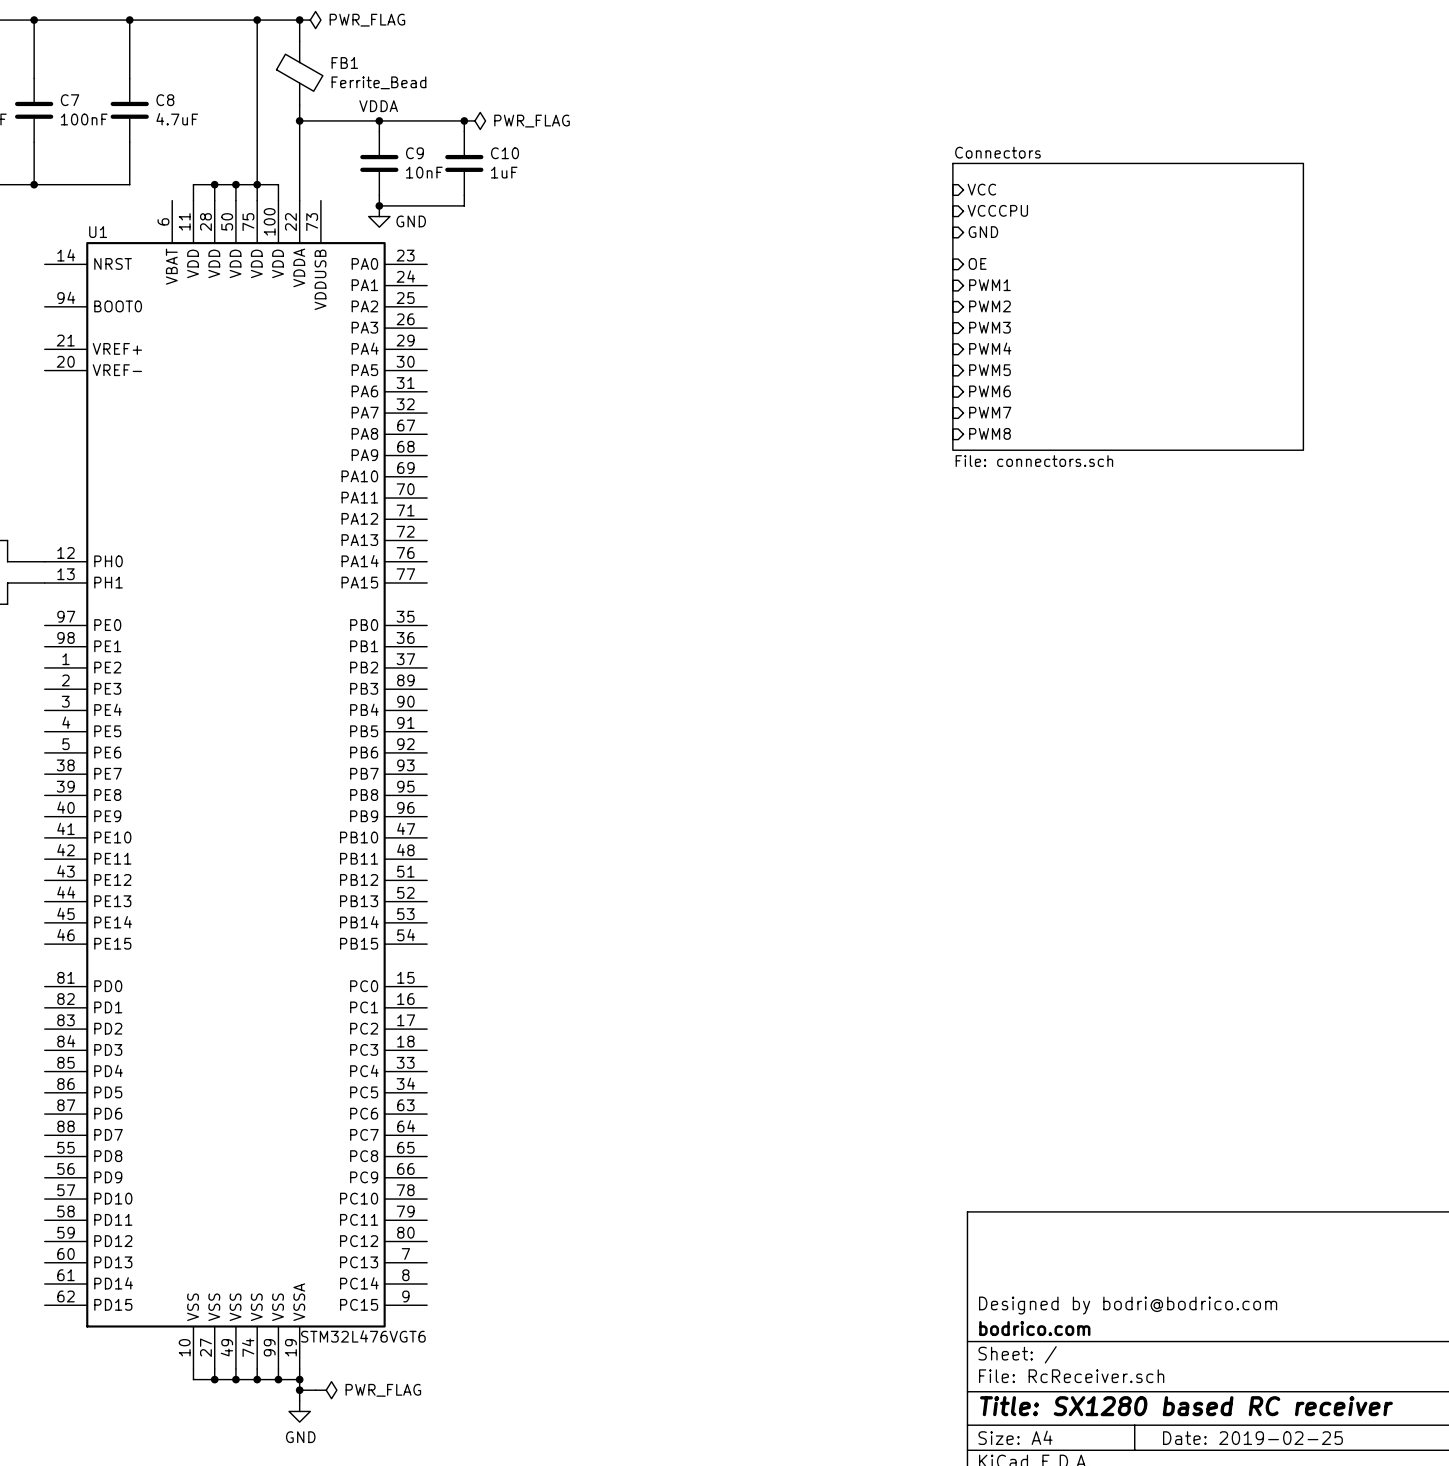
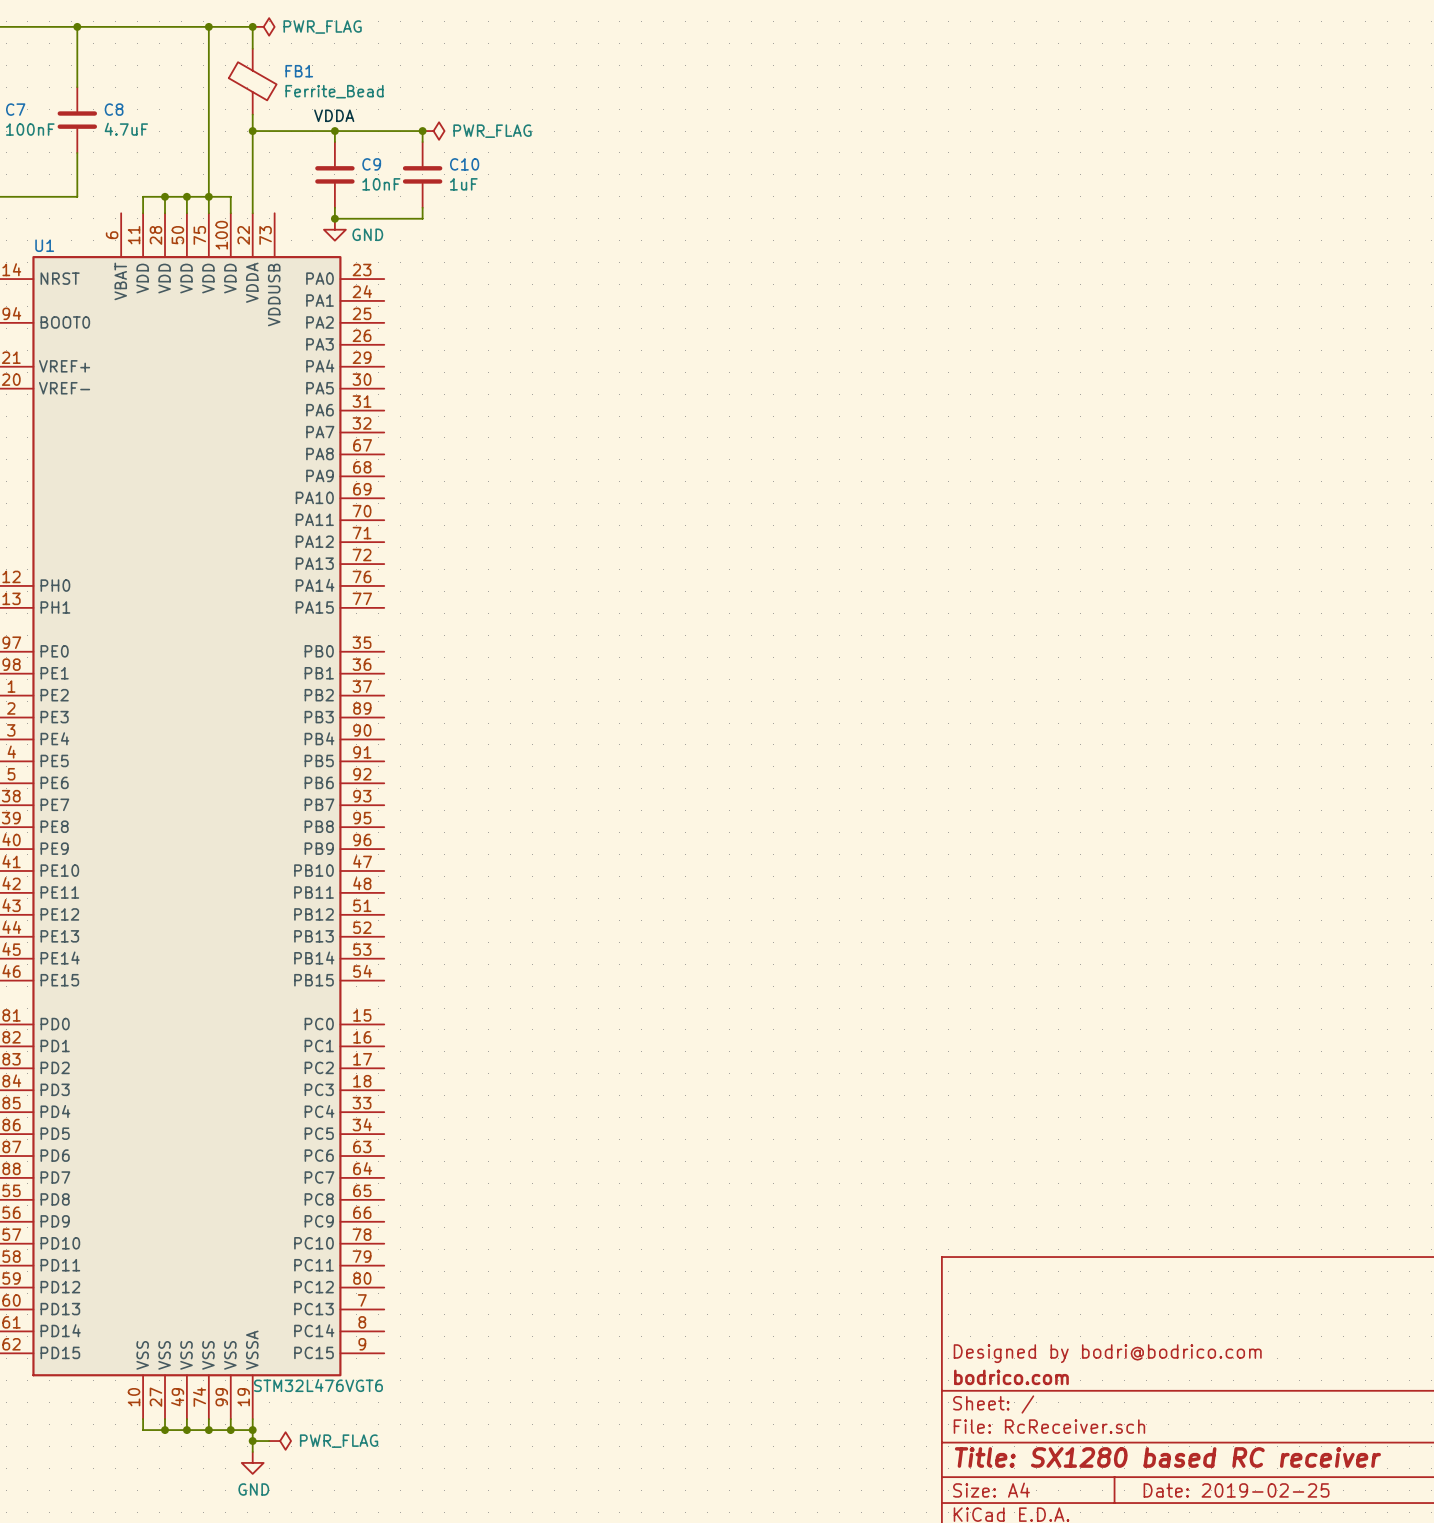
sheet pin: VCC (981, 189) -> none
sheet pin: VCCCPU (997, 210) -> none
sheet pin: GND (983, 232) -> none
sheet pin: OE (977, 263) -> none
sheet pin: PWM1 (989, 285) -> none
sheet pin: PWM2 (989, 306) -> none
sheet Connectors: File: connectors.sch (1128, 306) -> none
sheet pin: PWM3 (989, 327) -> none
sheet pin: PWM4 (990, 348) -> none
sheet pin: PWM5 (989, 370) -> none
sheet pin: PWM6 (989, 391) -> none
sheet pin: PWM7 (990, 412) -> none
sheet pin: PWM8 (989, 433) -> none

